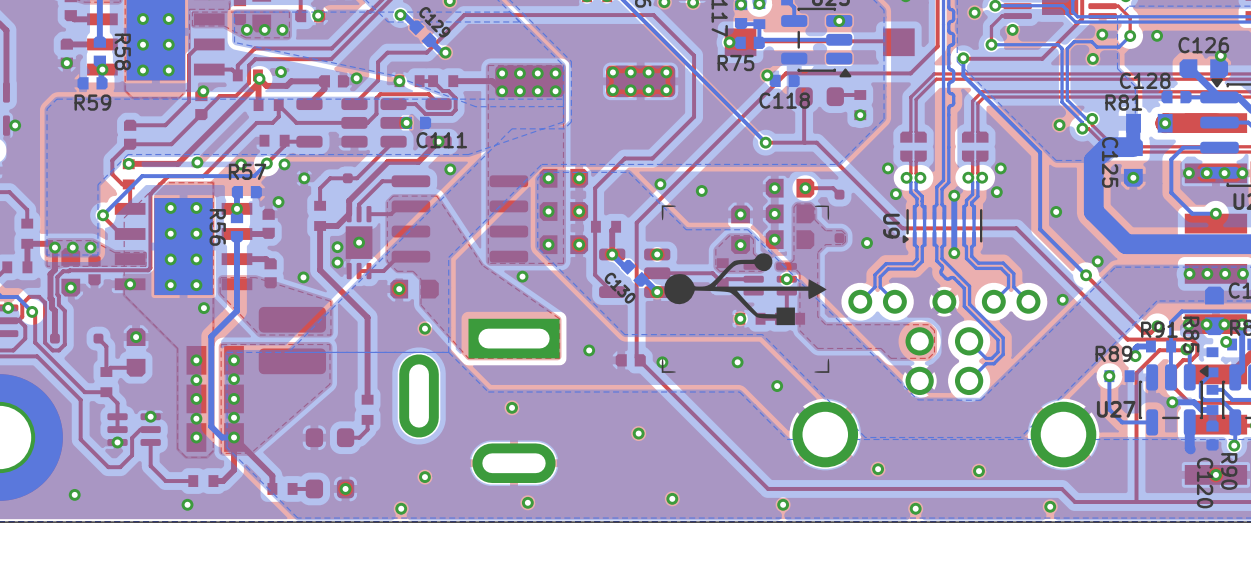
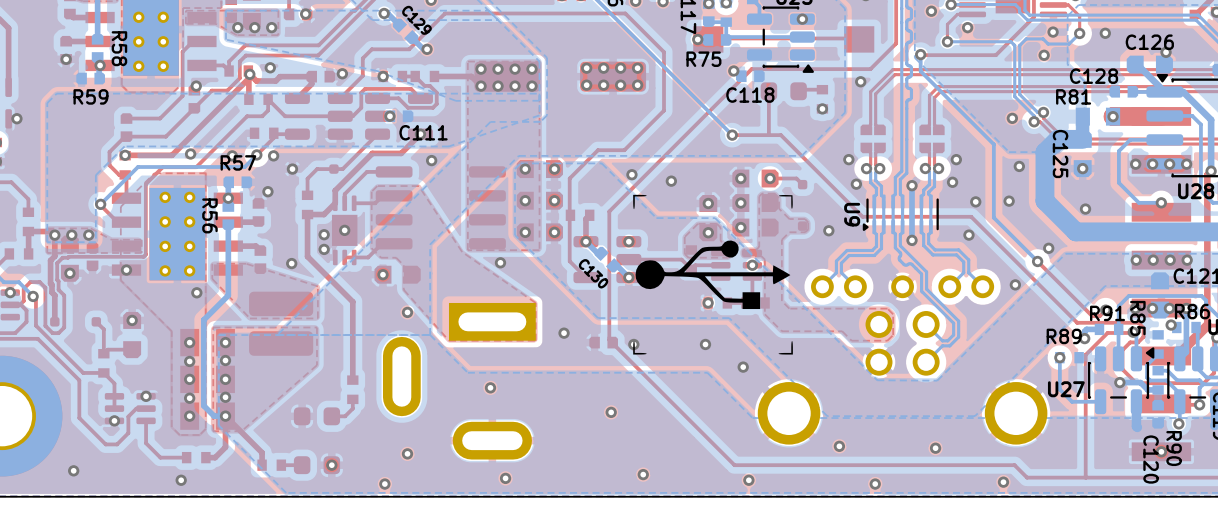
via: none -> (860, 81)
via: none -> (1019, 166)
via: none -> (975, 201)
via: none -> (1085, 209)
via: none -> (968, 235)

